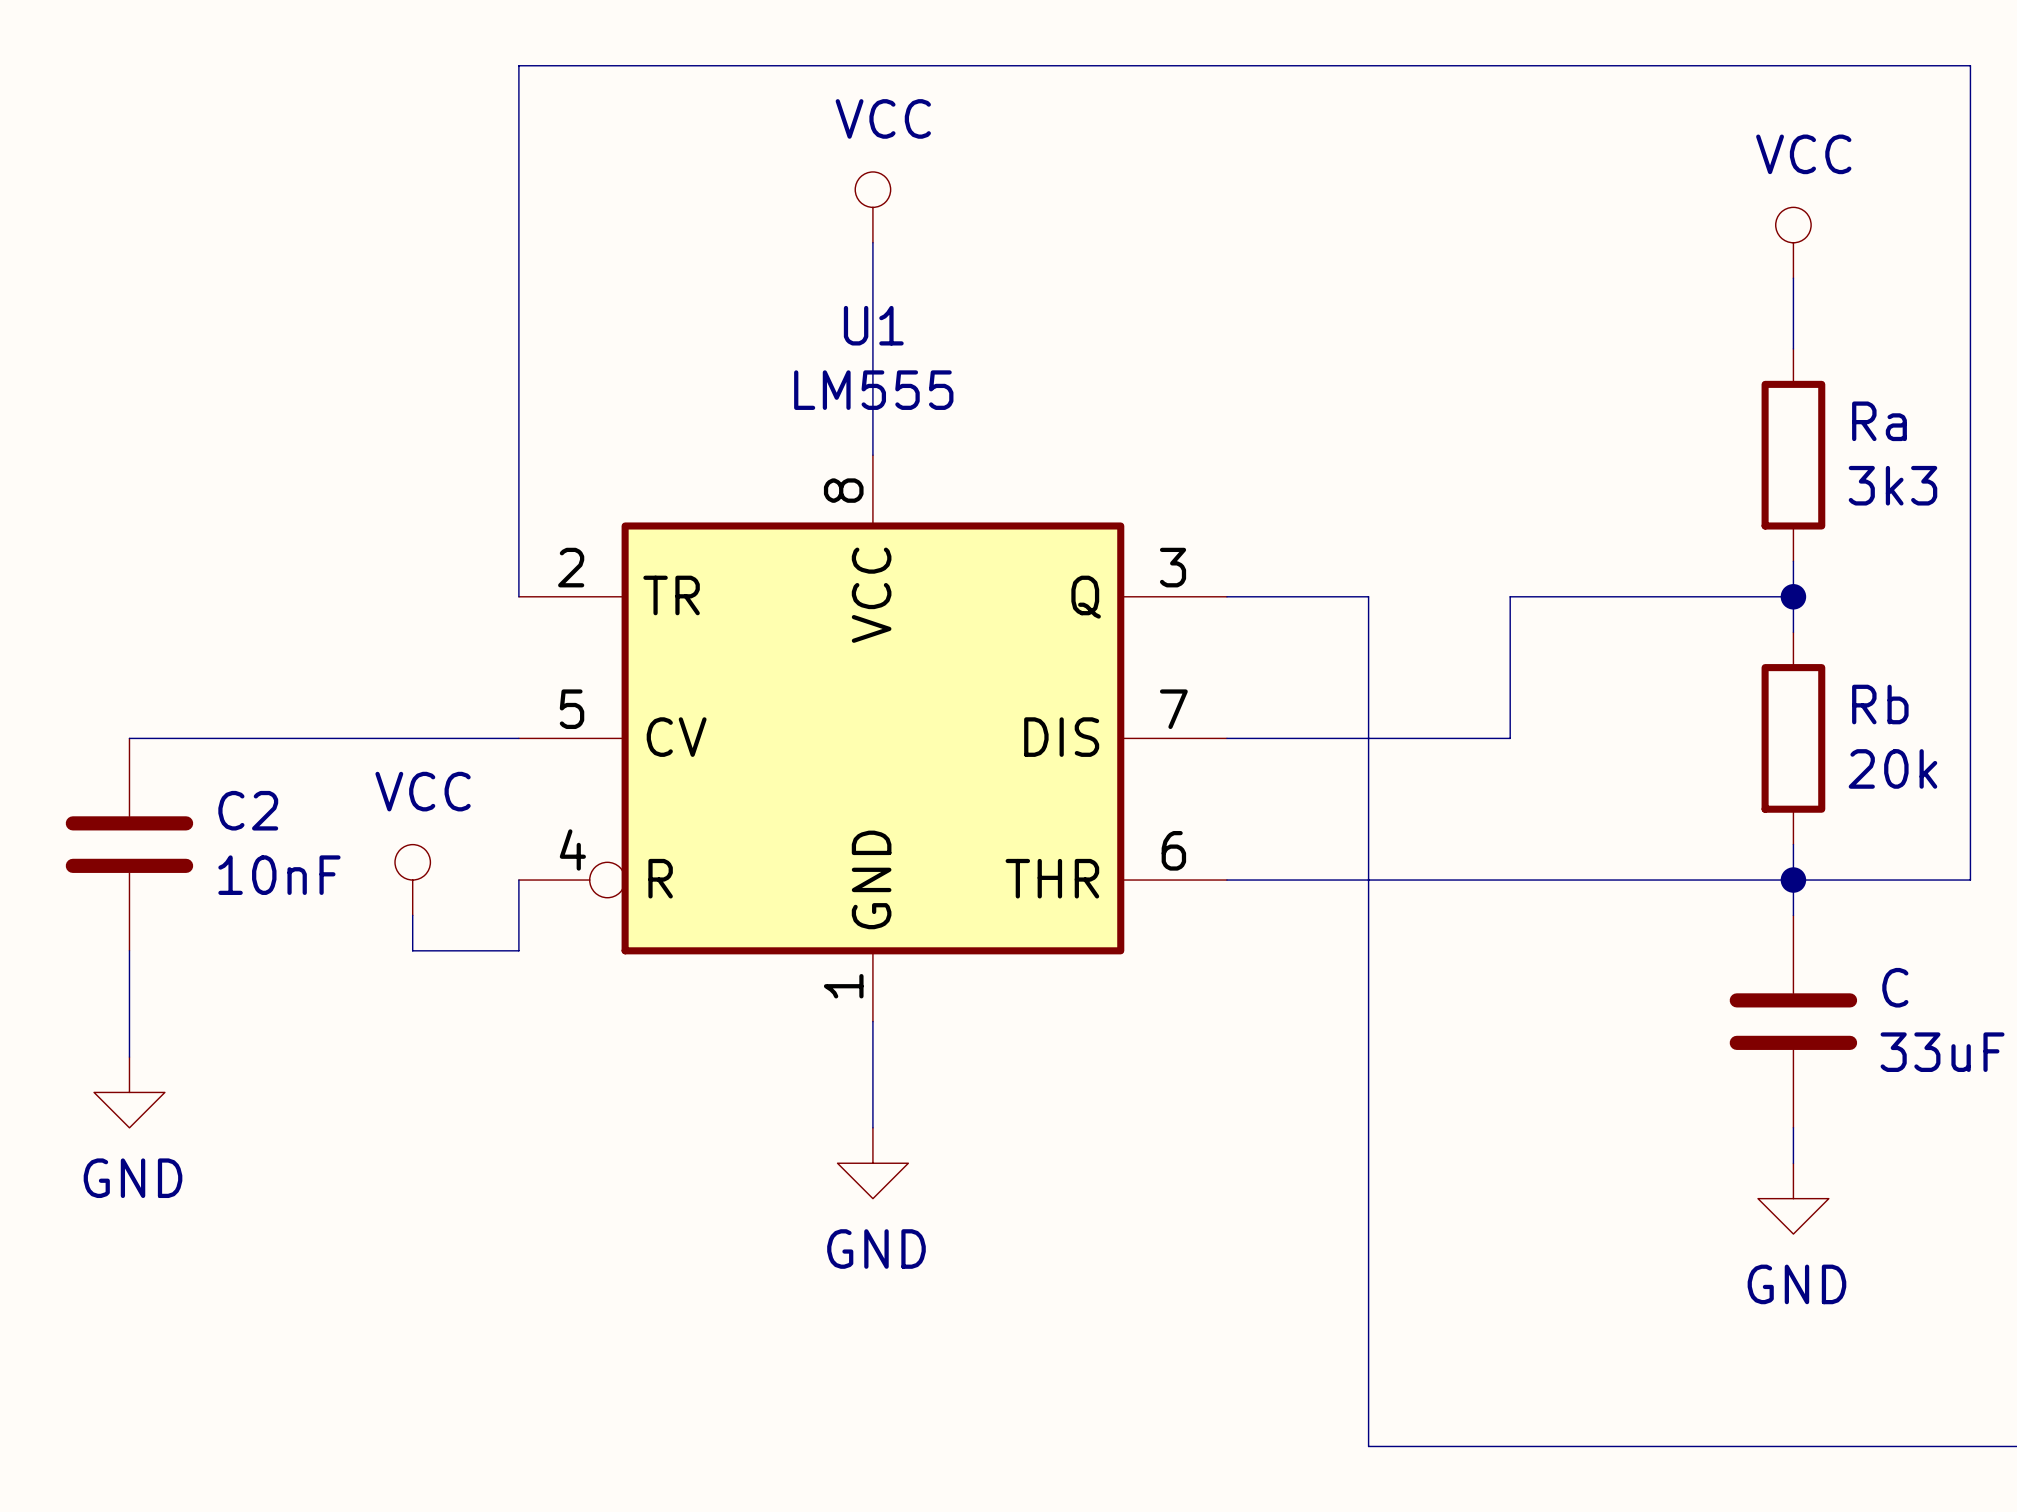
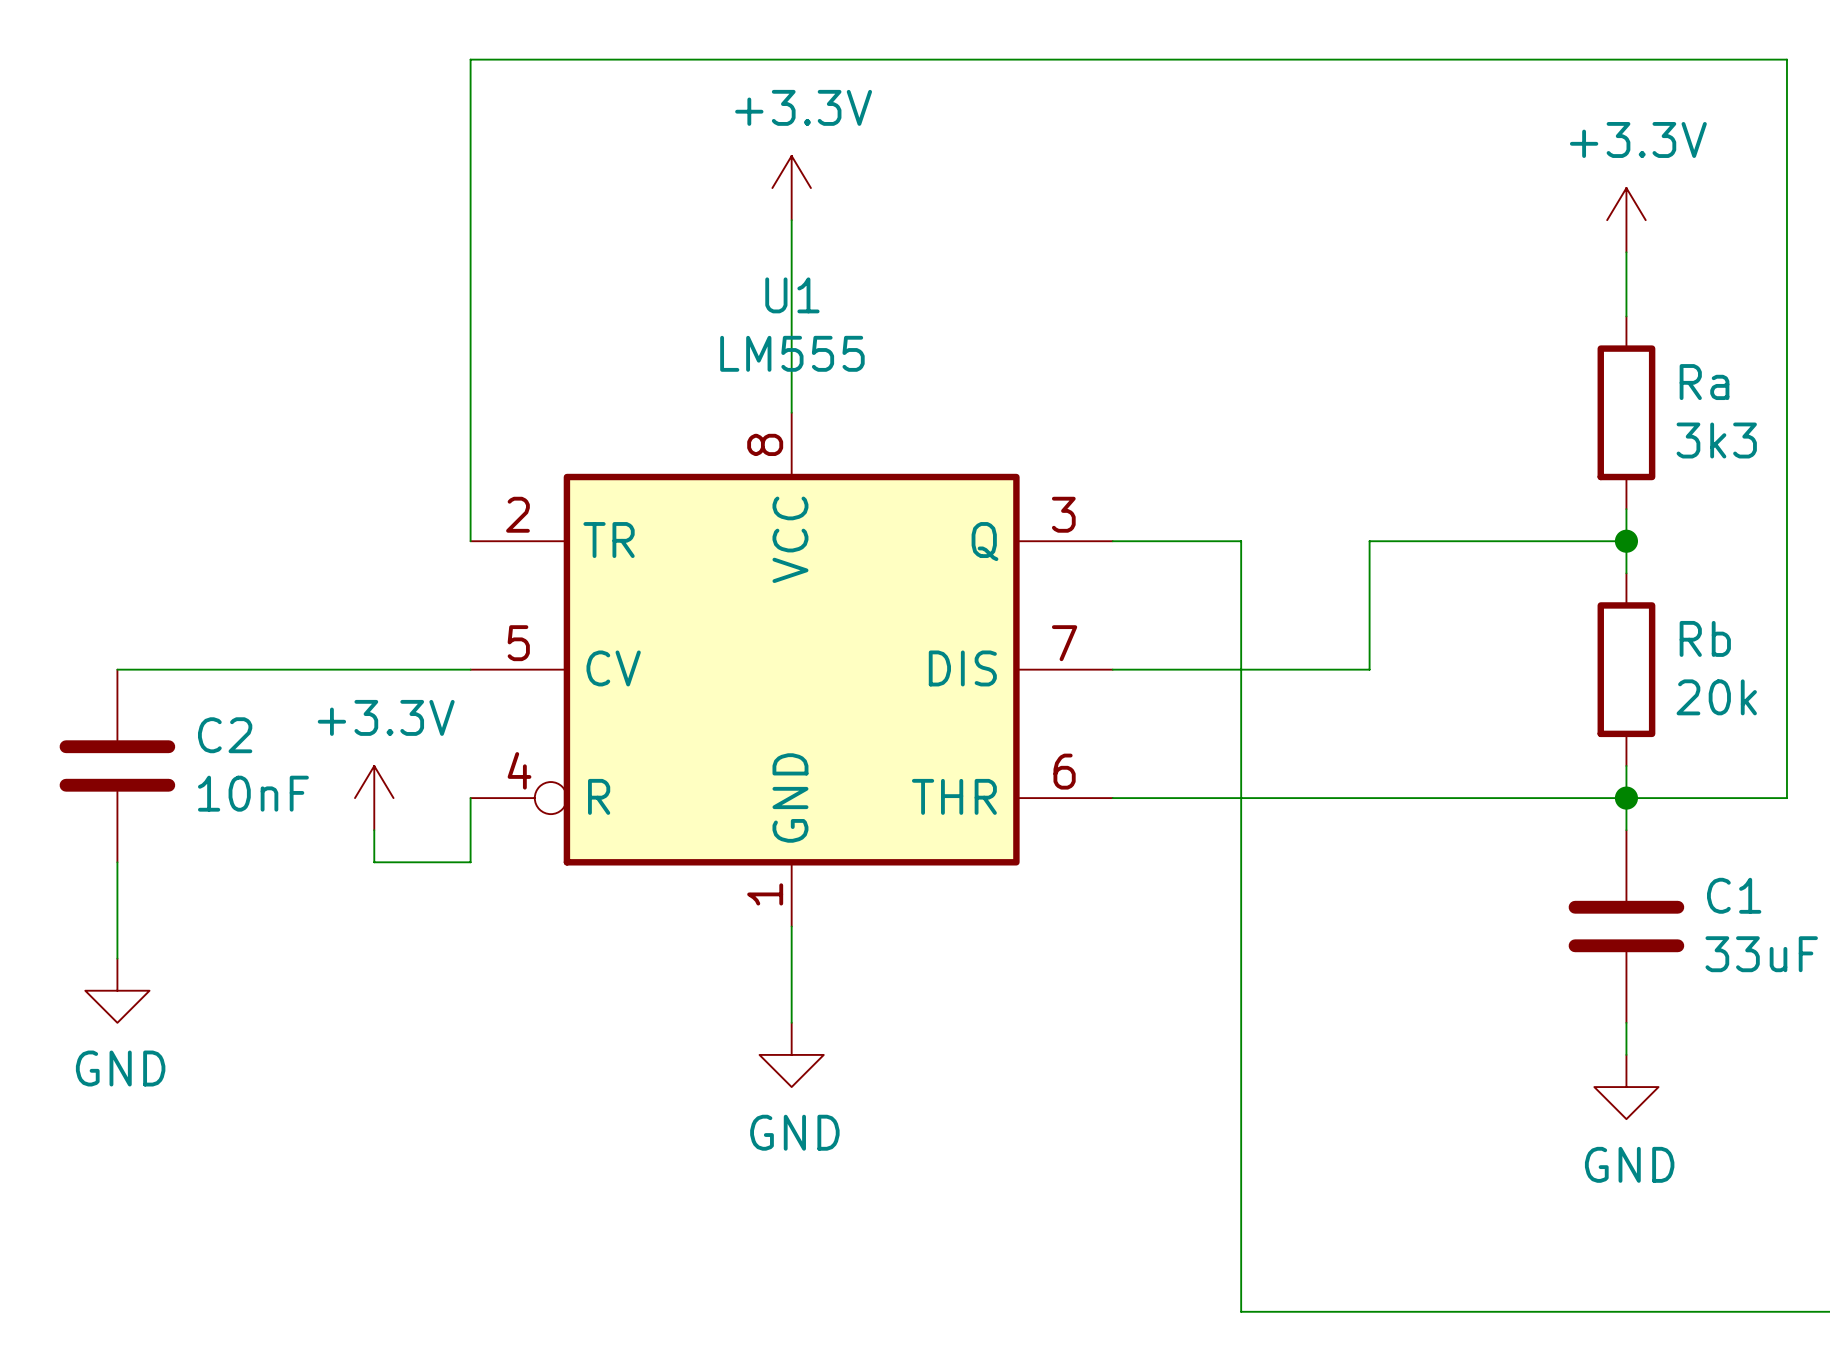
power symbol: VCC (872, 207) -> +3.3V (791, 188)
power symbol: VCC (1793, 242) -> +3.3V (1626, 220)
power symbol: VCC (412, 880) -> +3.3V (374, 798)
C name: C (1895, 987) -> C1 (1734, 895)

